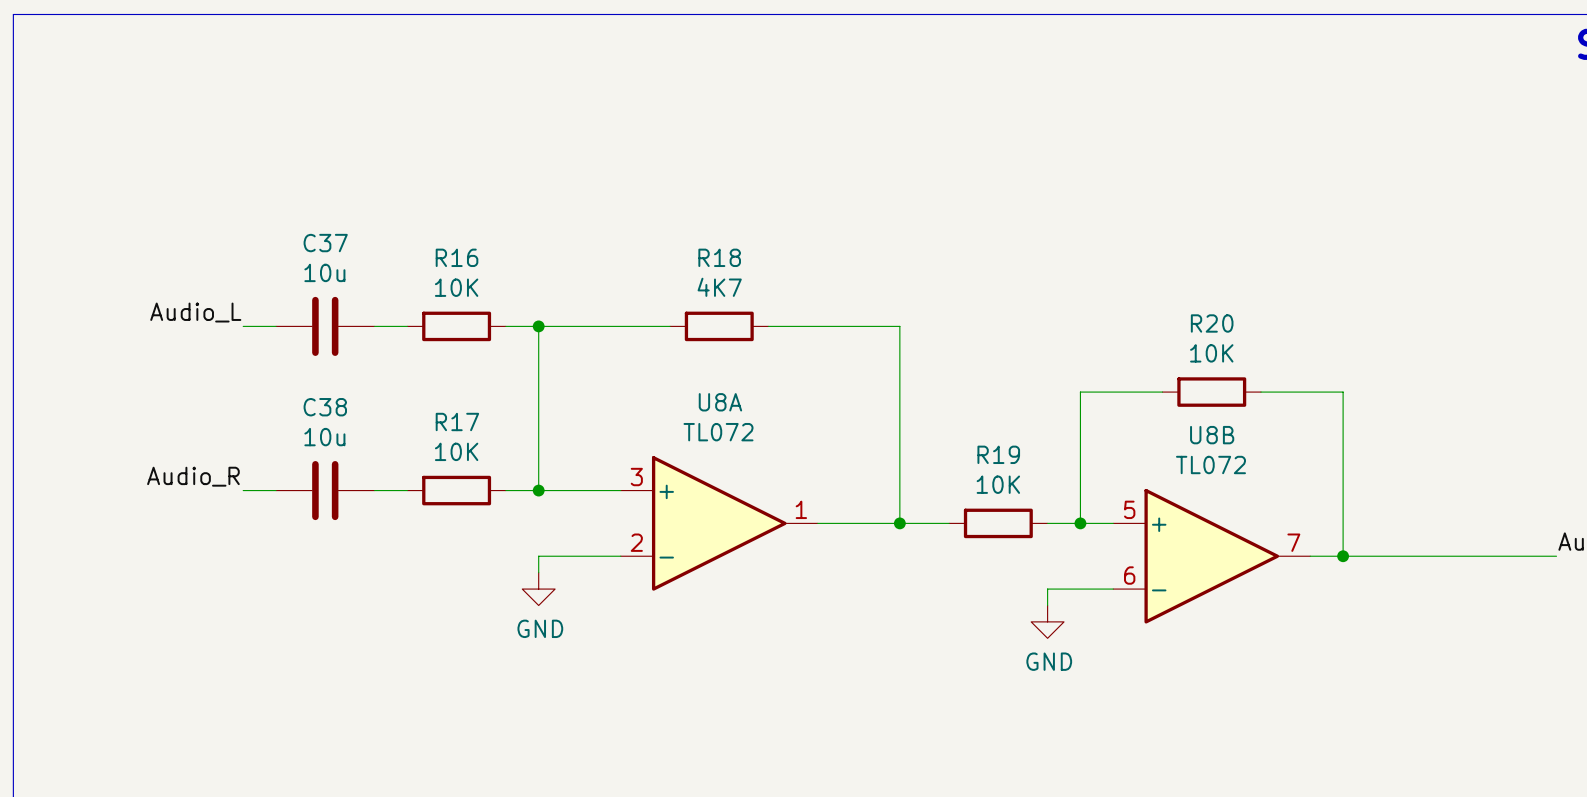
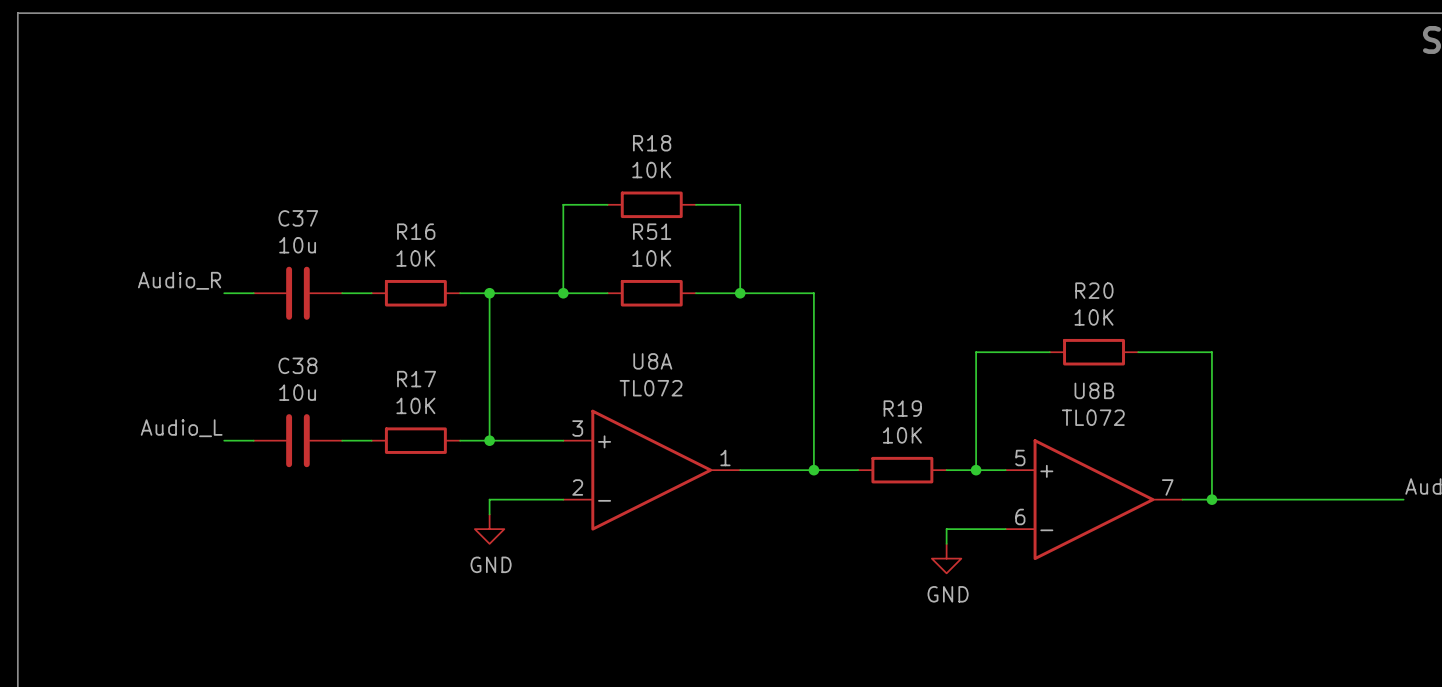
wire: none -> (607, 204) (563, 204) (563, 293)
R18: none -> 10K (651, 204)
wire: none -> (695, 204) (740, 204) (740, 293)
R18 name: R18 (719, 257) -> R51 (652, 231)
R18 value: 4K7 (719, 287) -> 10K (651, 258)
label: Audio_L (195, 312) -> Audio_R (179, 280)
junction: none -> (563, 293)
junction: none -> (740, 293)
label: Audio_R (193, 476) -> Audio_L (181, 428)

